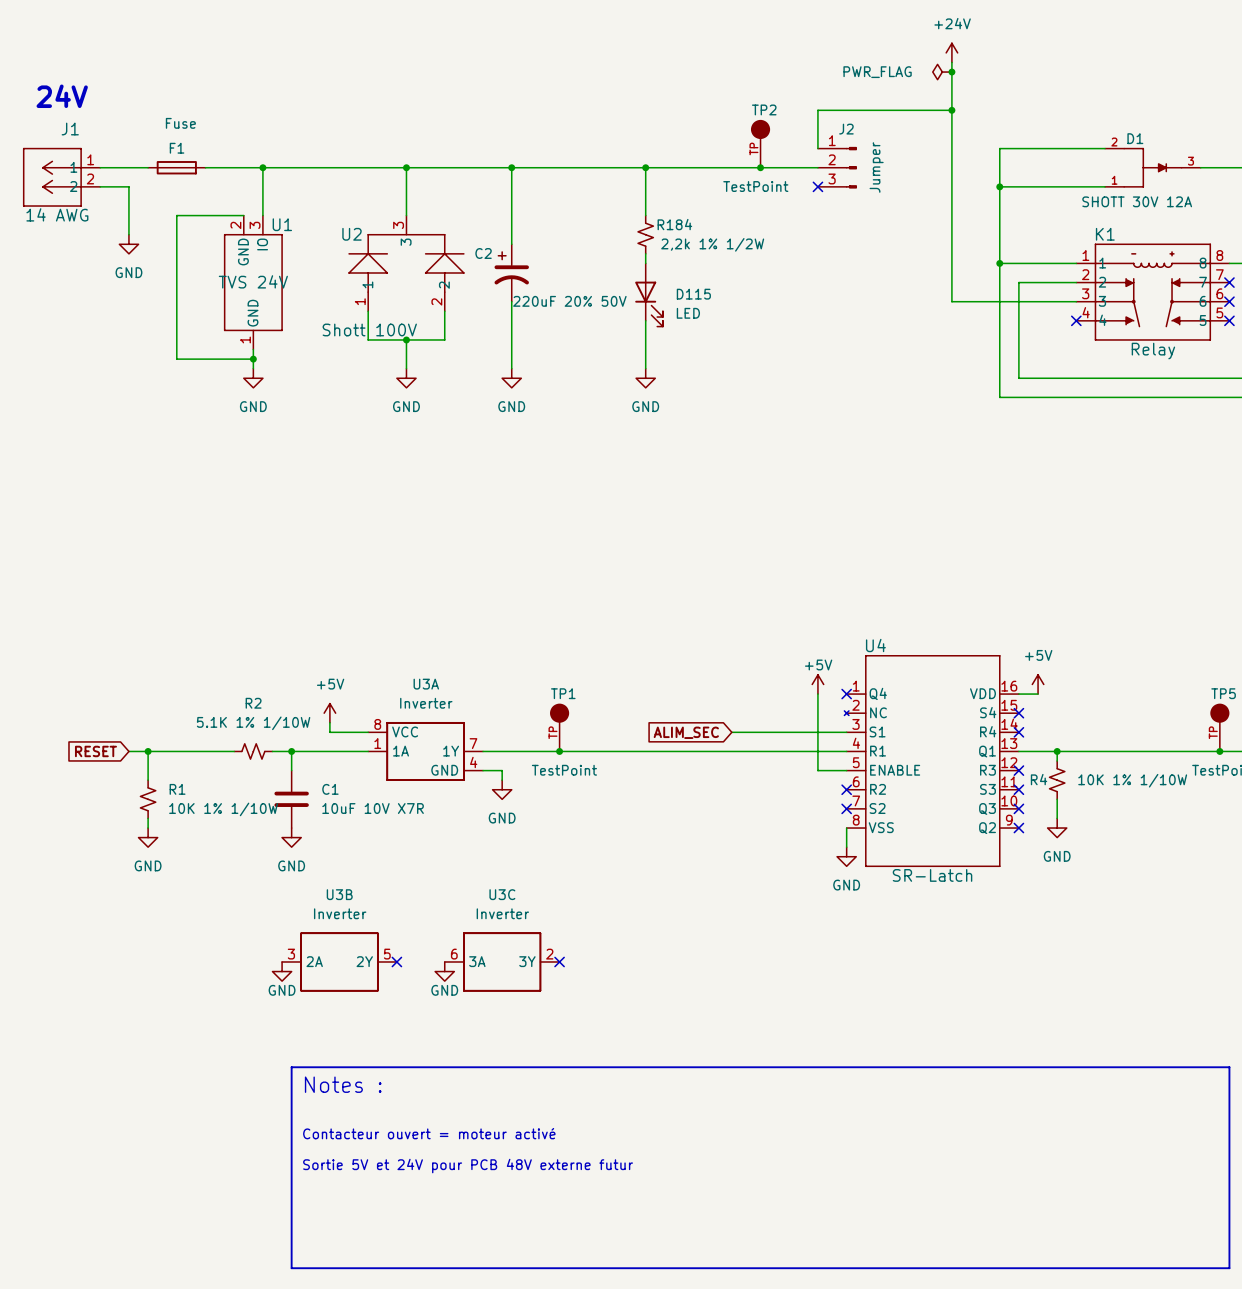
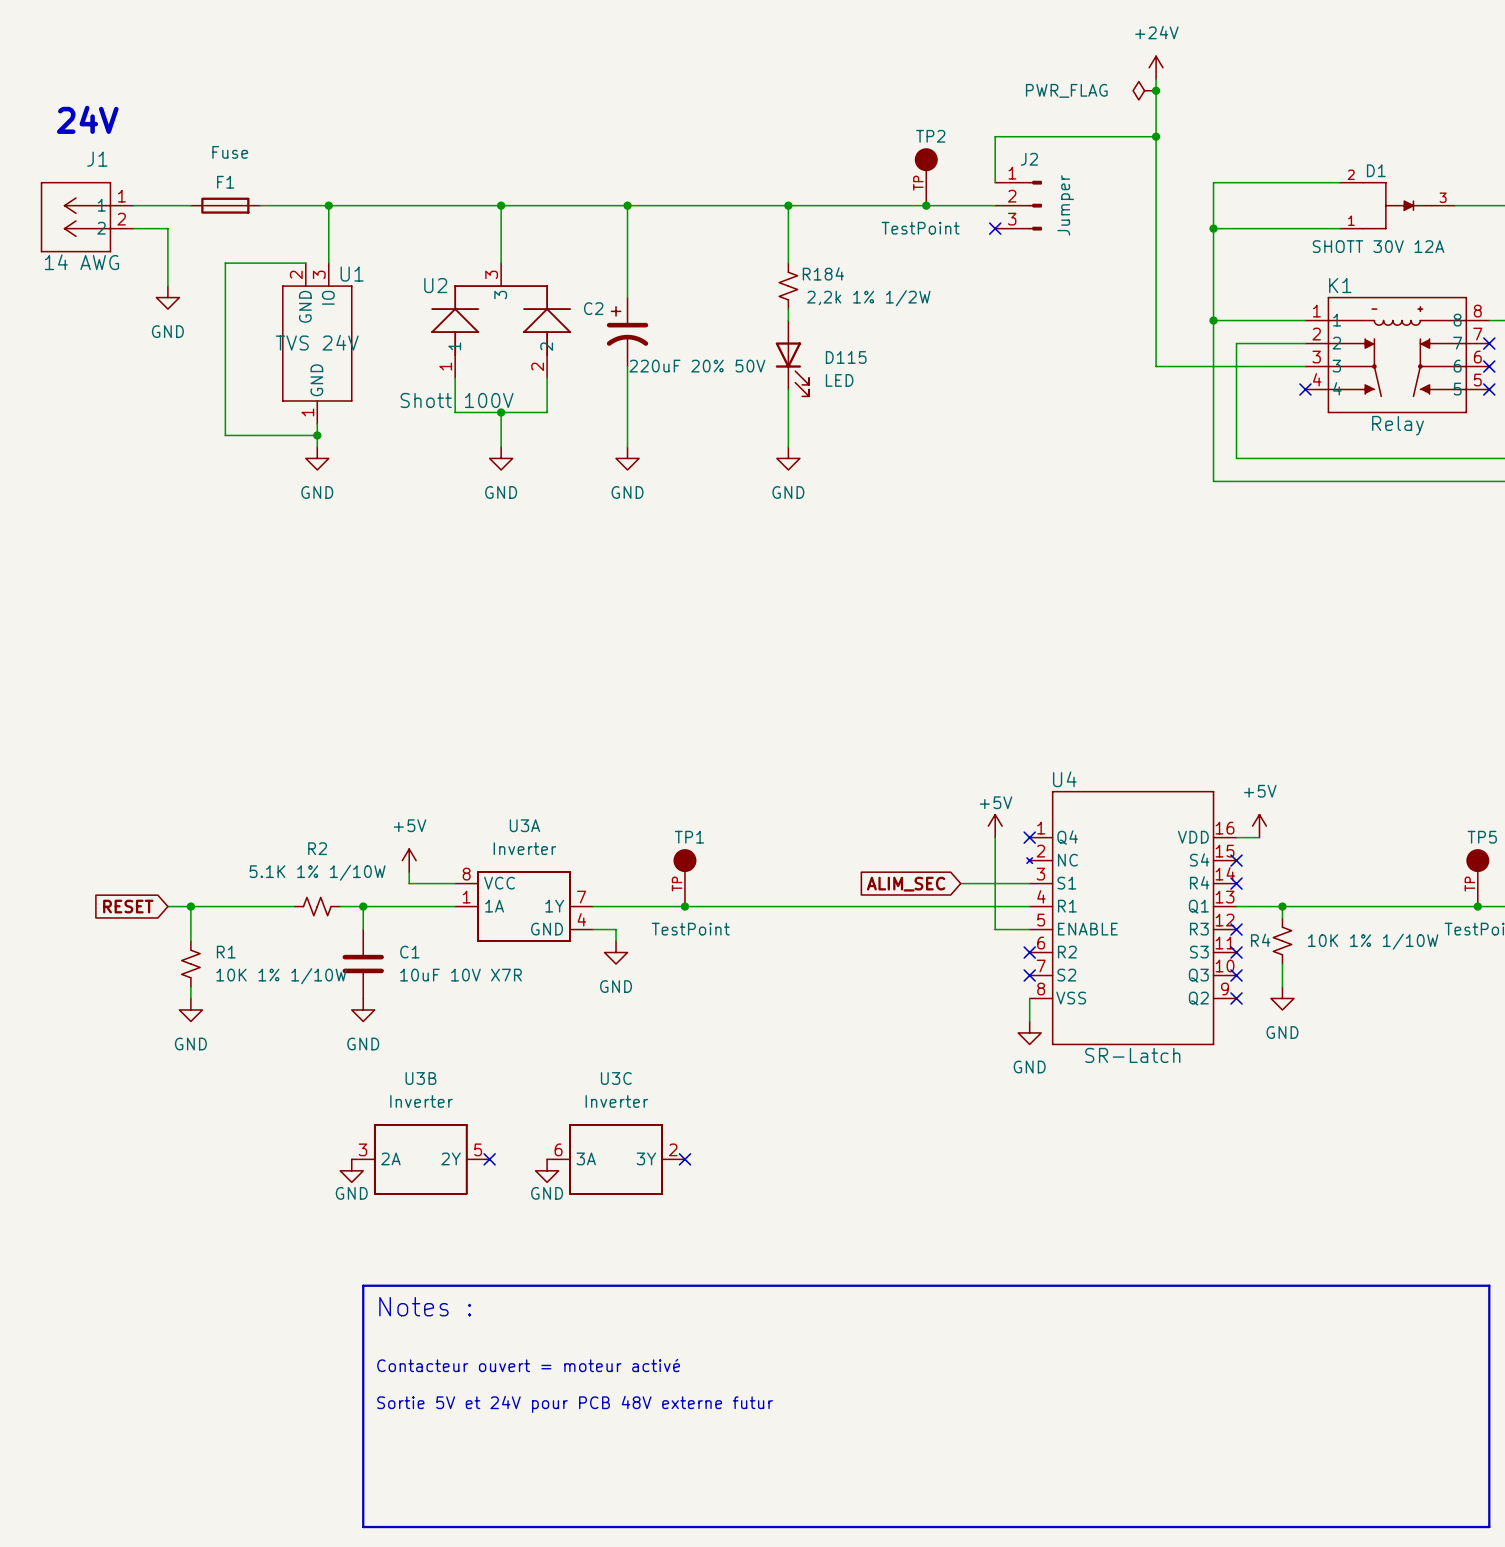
global label position: ALIM_SEC (686, 732) -> ALIM_SEC (906, 884)
wire: (731, 732) (789, 732) -> none

